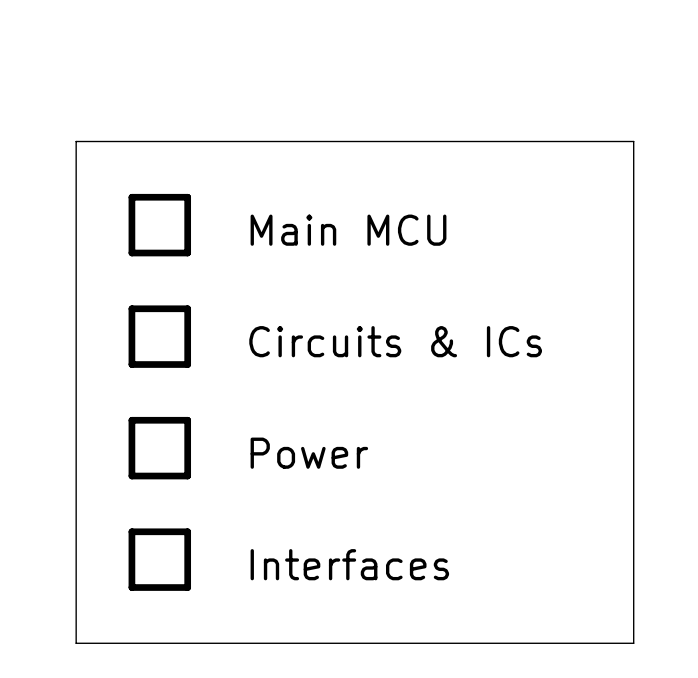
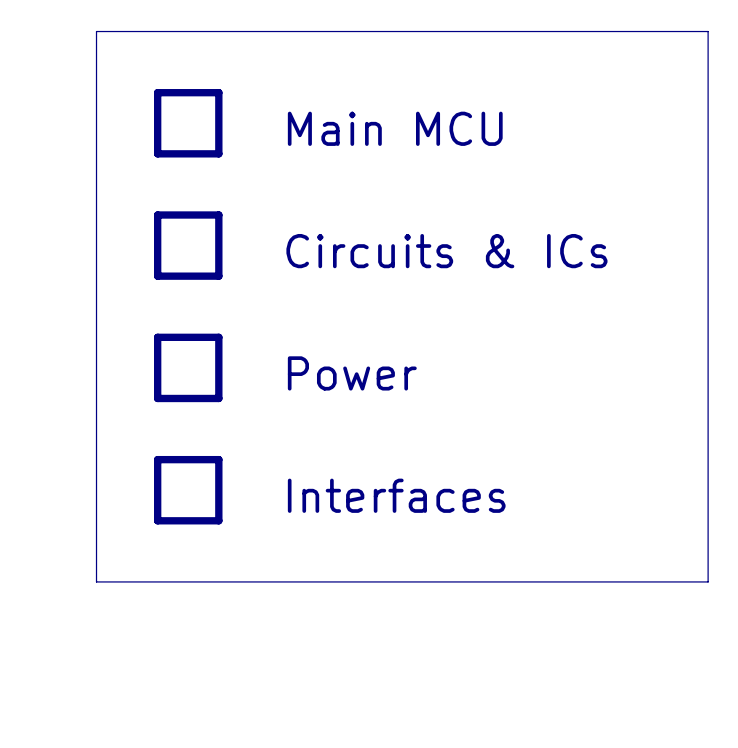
text: none -> Main MCU (395, 128)
line: (76, 141) (131, 141) -> (218, 153) (218, 92) (157, 92) (157, 153)
line width: thin (131, 141) (187, 141) -> thick (157, 153) (218, 153)
line: (187, 141) (633, 141) -> (96, 153) (96, 31) (708, 31) (708, 153)
text: Main MCU (348, 230) -> Circuits & ICs (446, 251)
text: Circuits & ICs (395, 341) -> Power (352, 373)
text: Power (309, 453) -> Interfaces (396, 495)
line: (76, 531) (76, 643) (633, 643) (633, 531) -> (218, 581) (708, 581)
line: (131, 531) (131, 587) (187, 587) (187, 531) -> (157, 581) (96, 581)
line width: thick (131, 531) (187, 531) -> thin (157, 581) (218, 581)
text: Interfaces (349, 564) -> none

